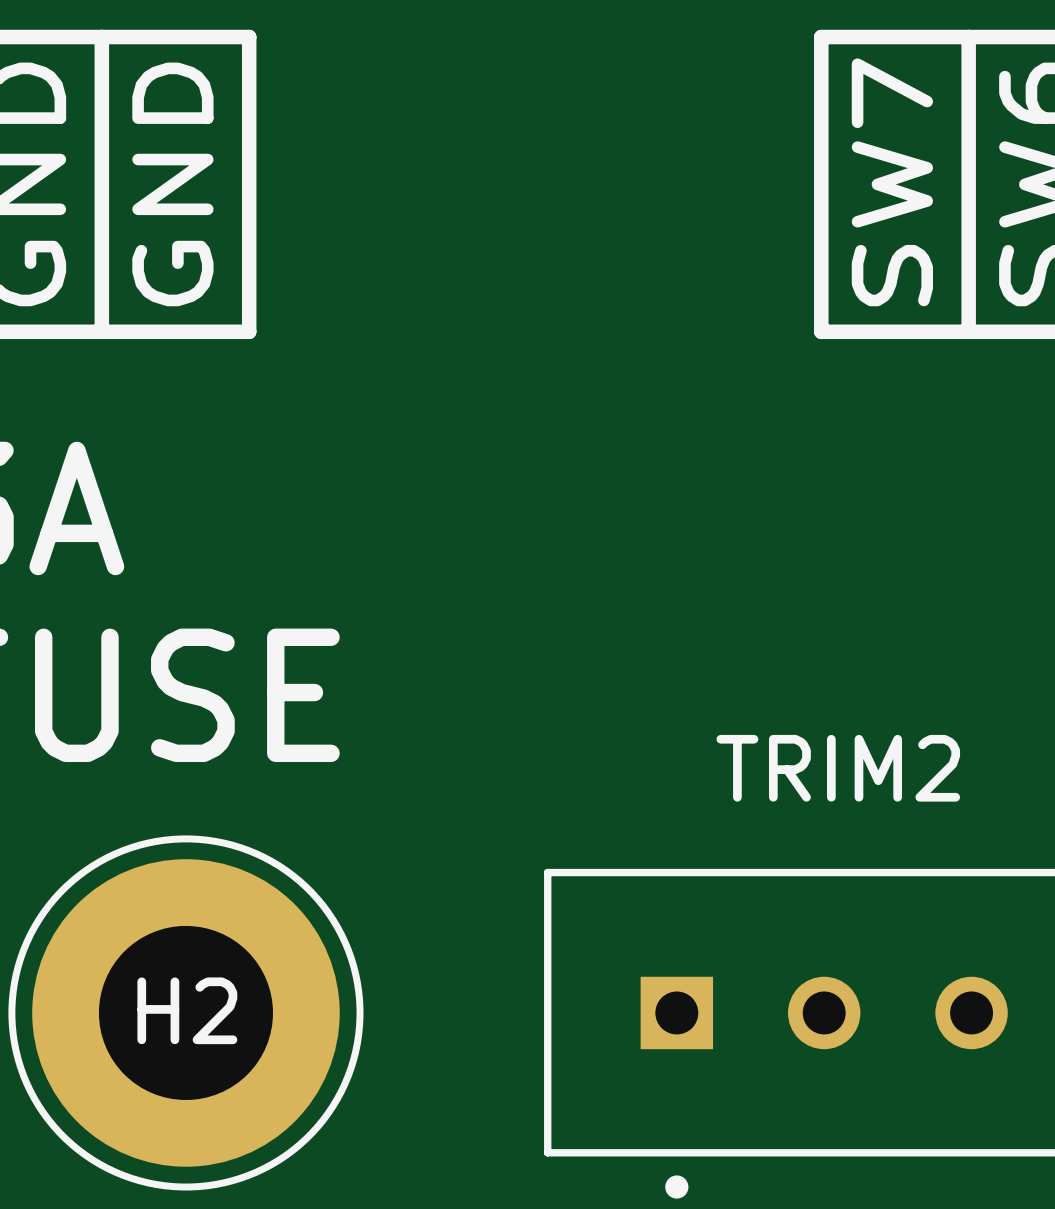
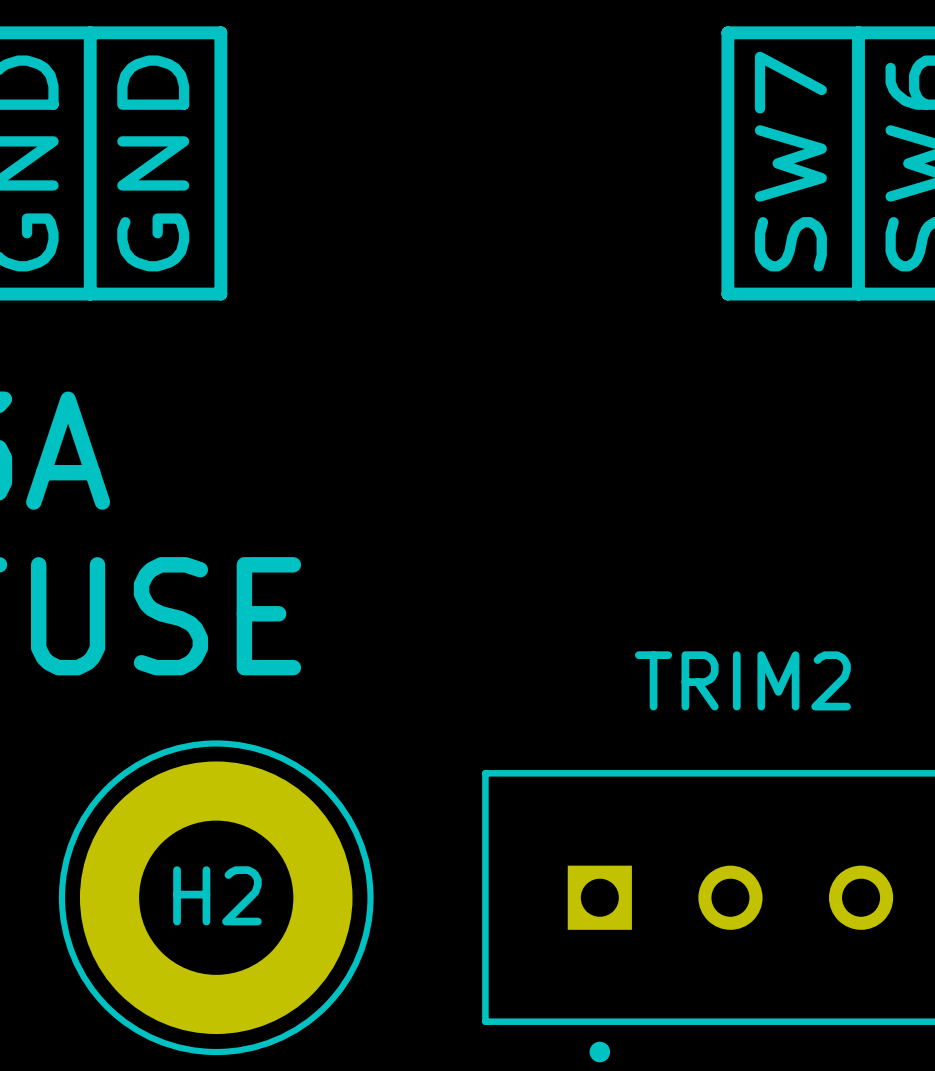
H2 position: (185, 1012) -> (216, 897)

